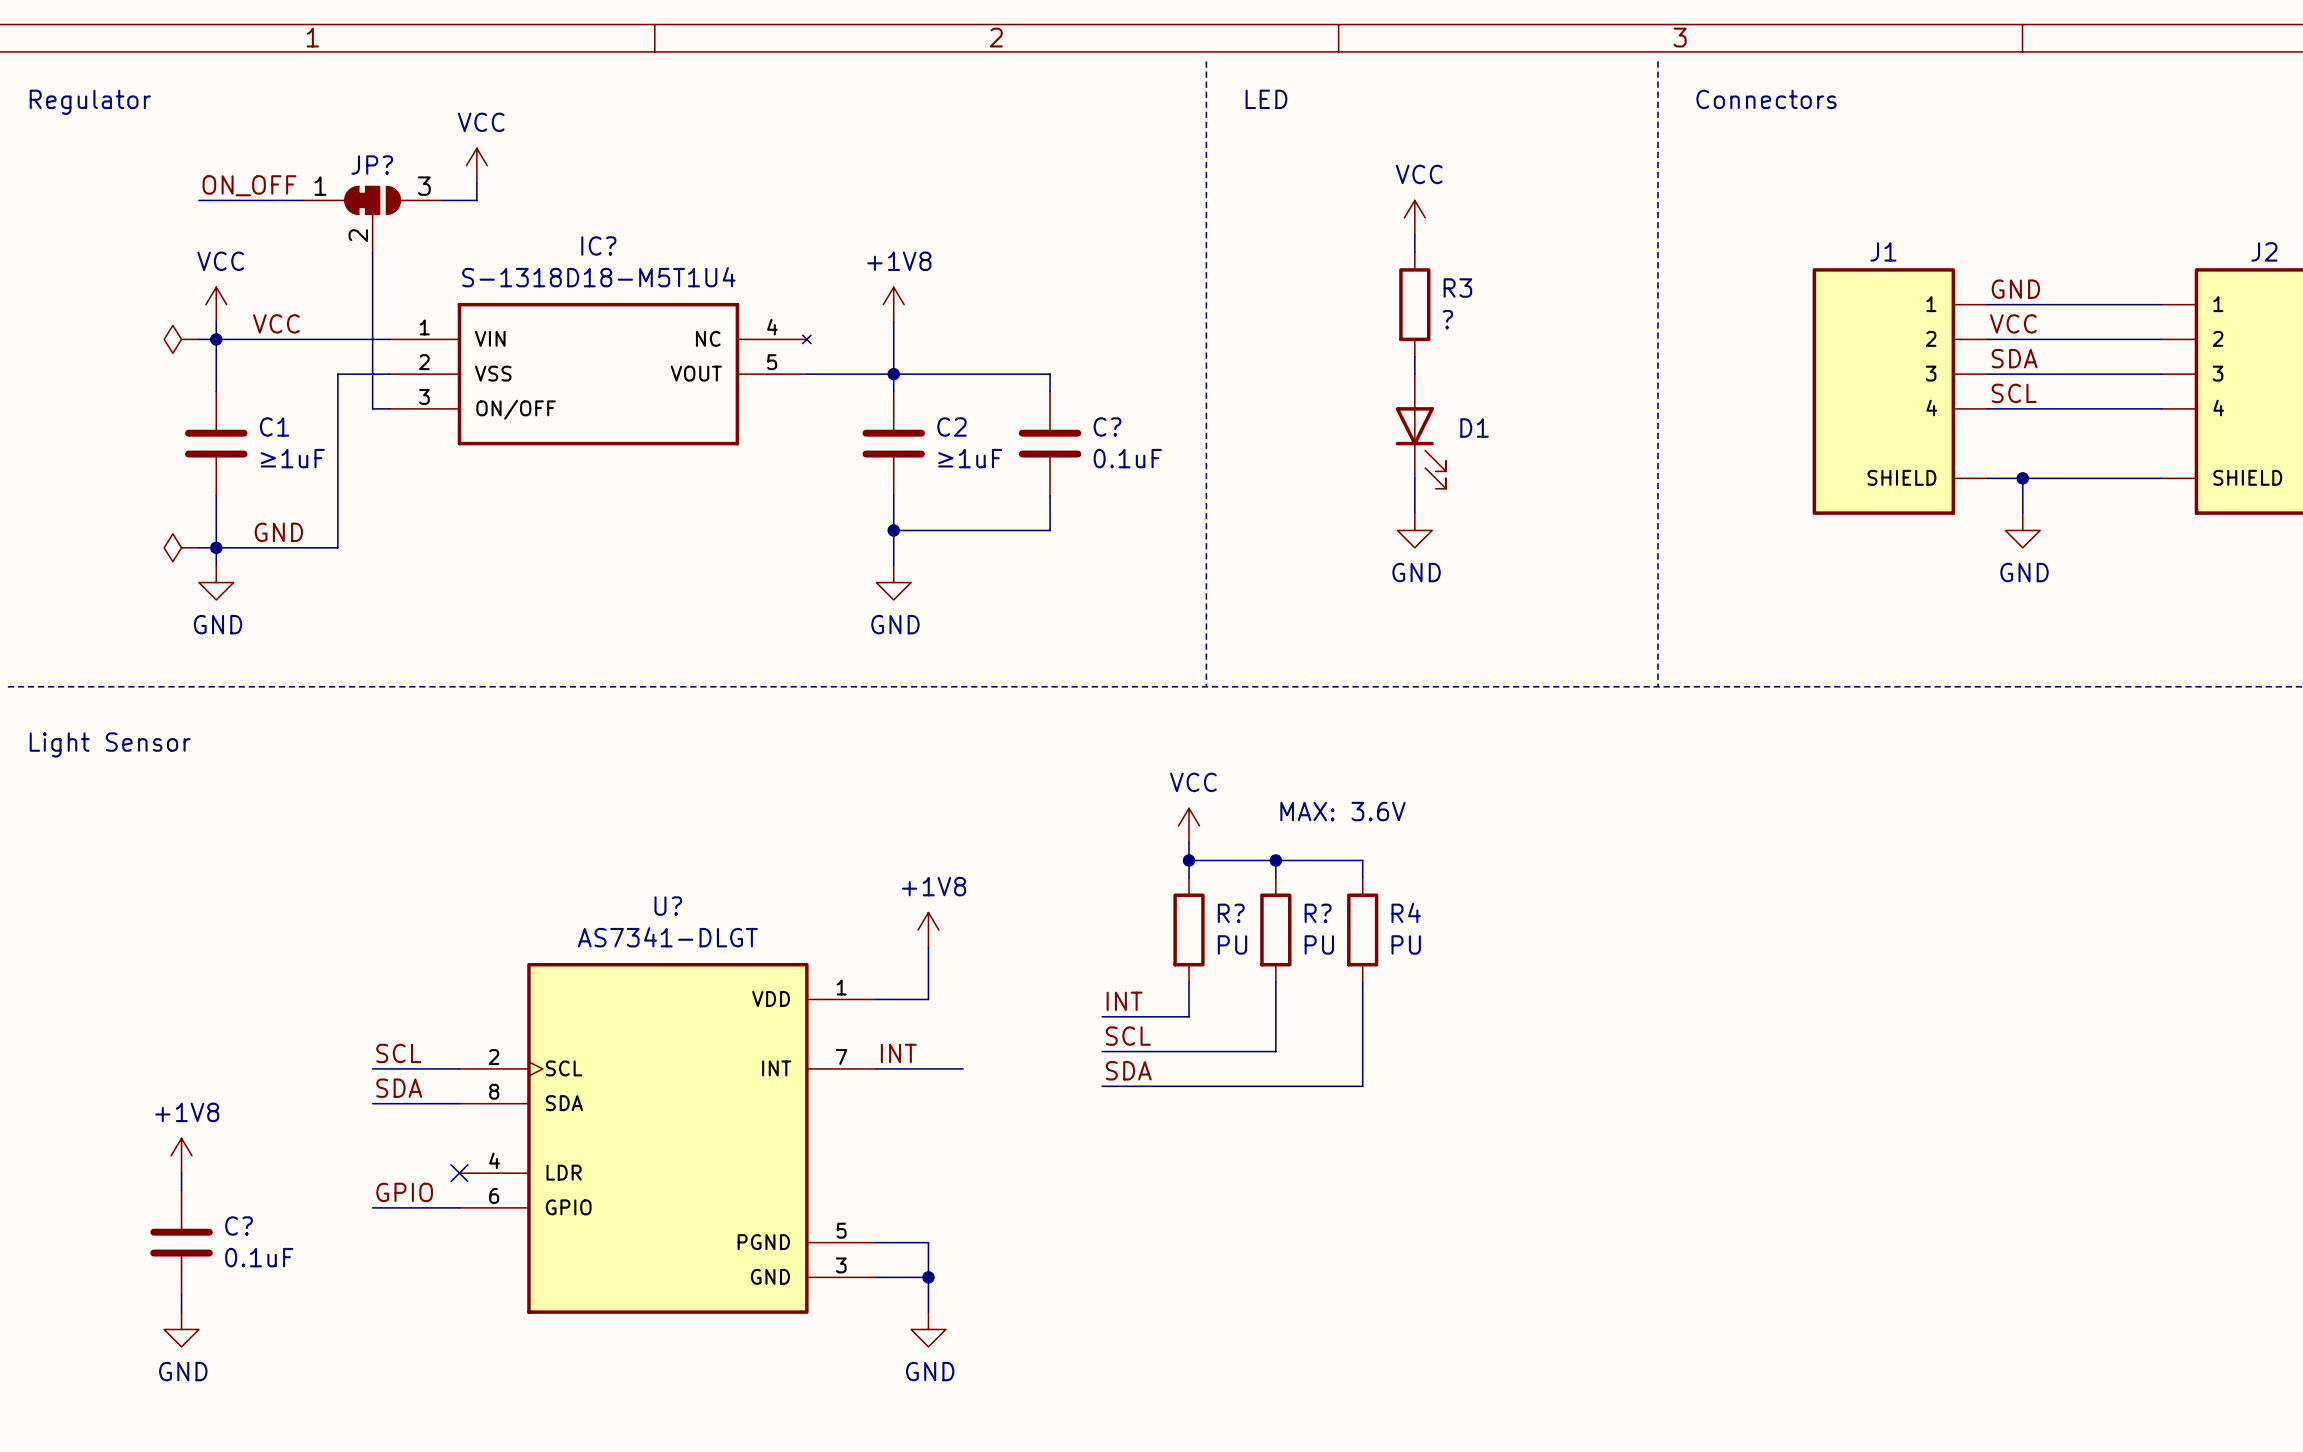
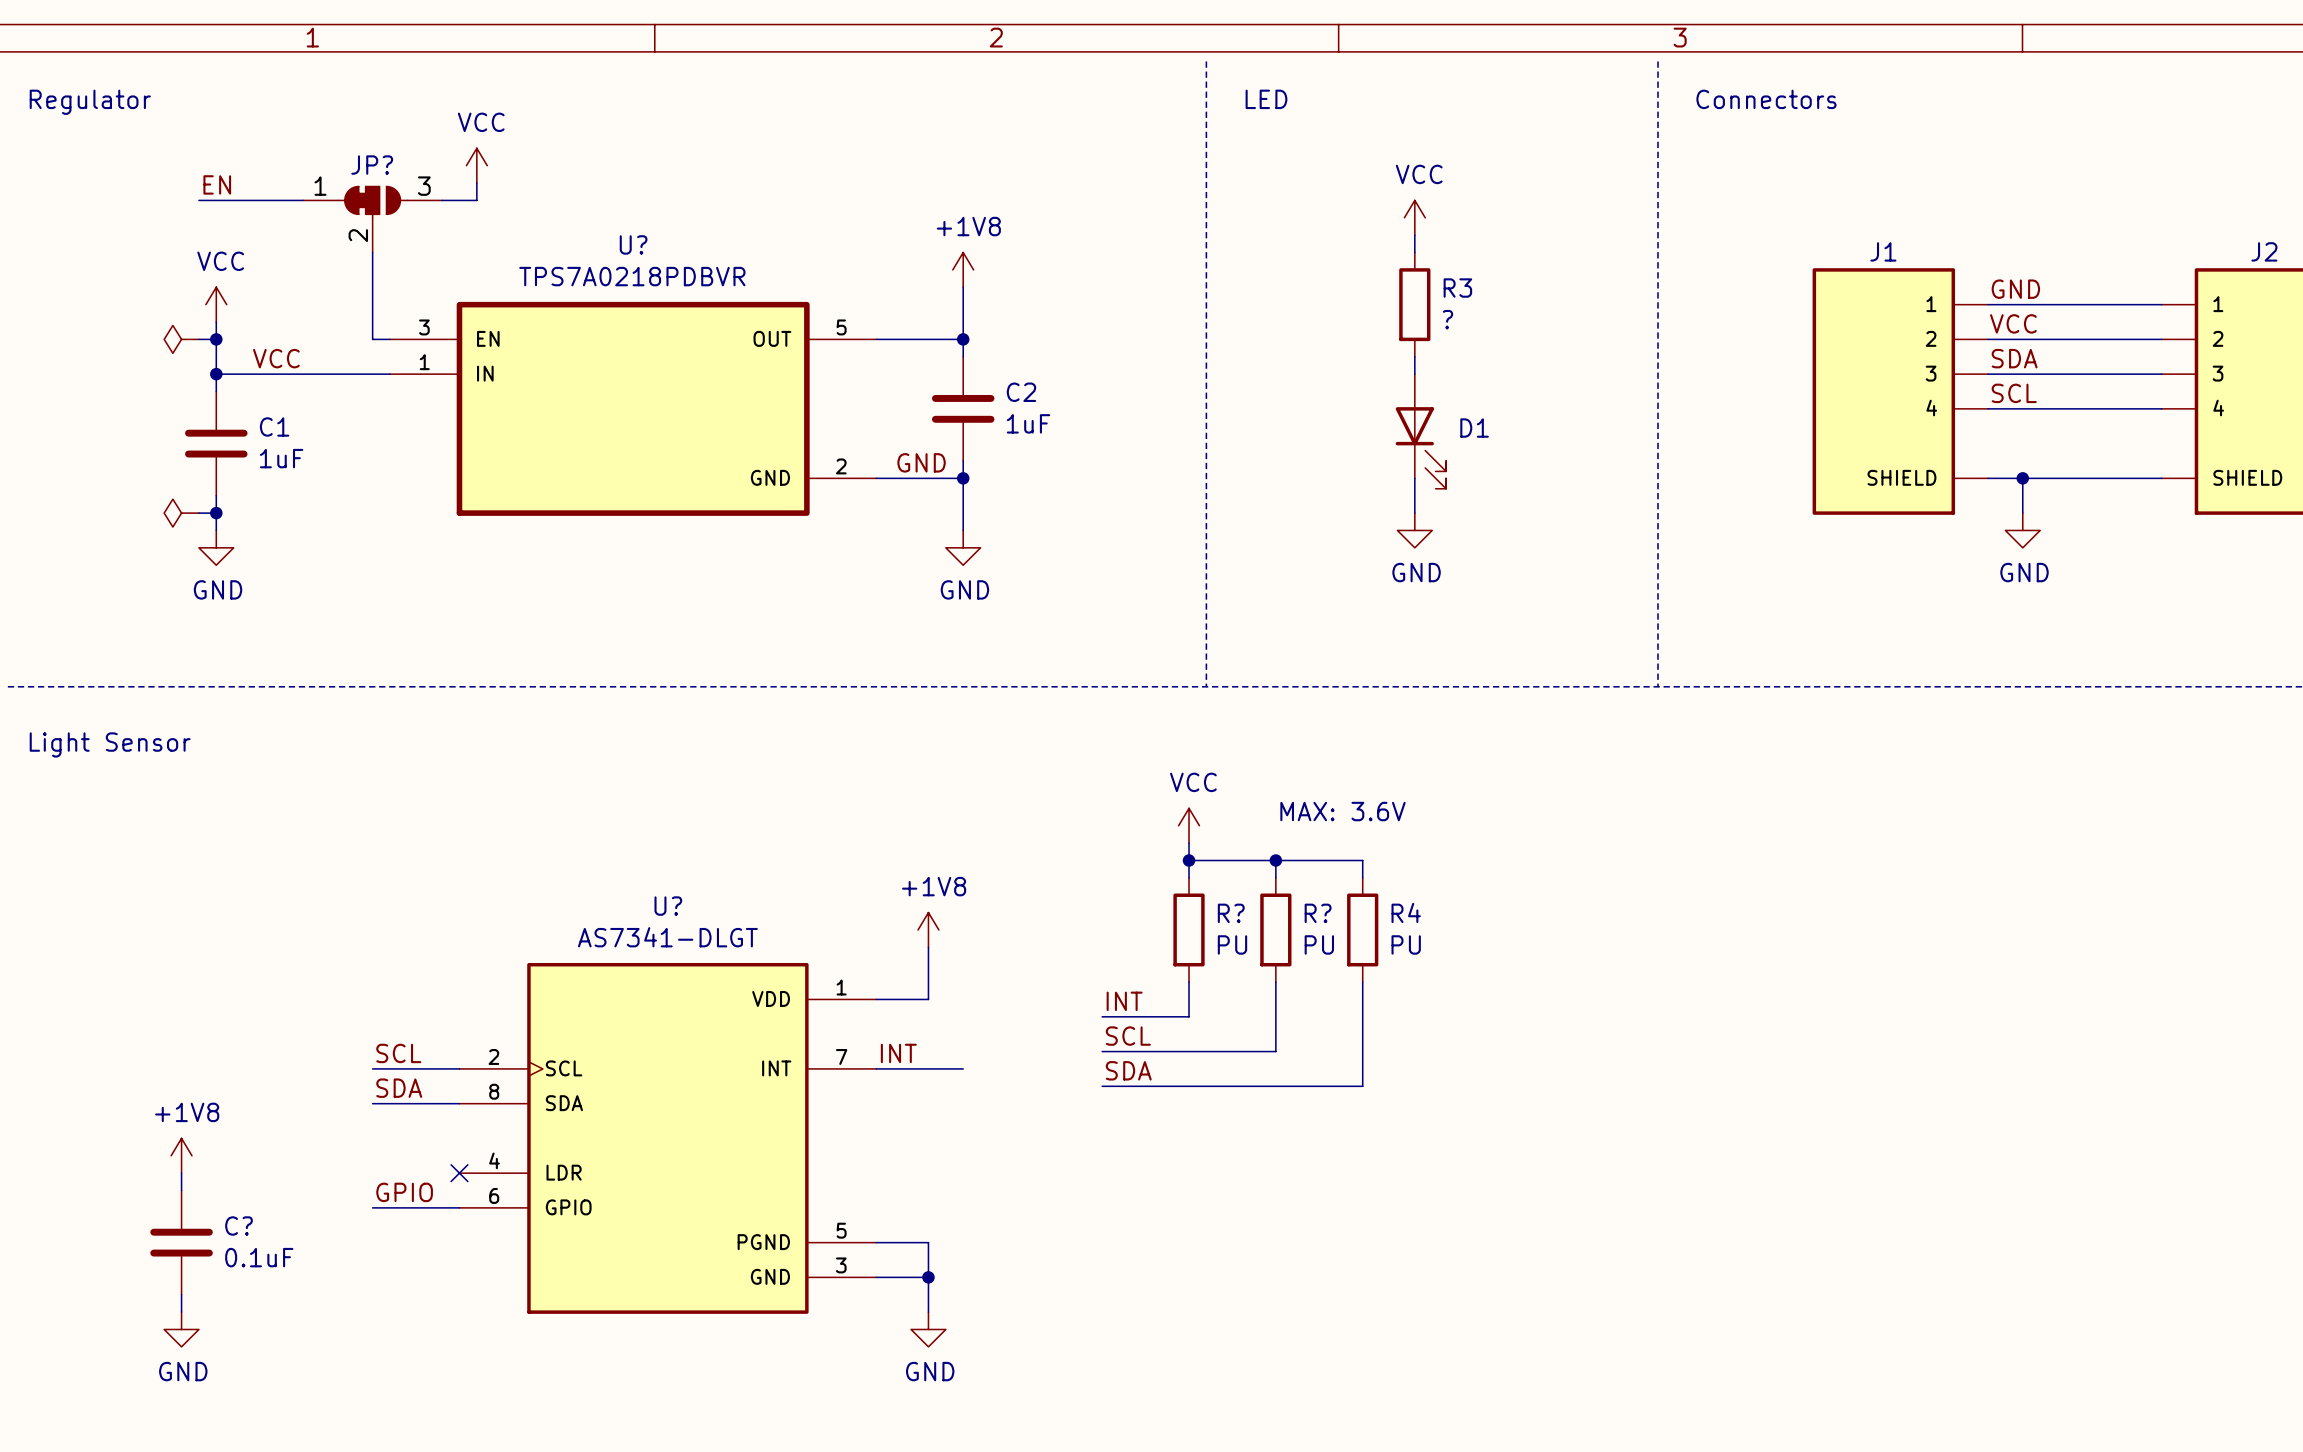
label: ON_OFF (249, 185) -> EN (217, 184)
power symbol position: +1V8 (893, 304) -> +1V8 (963, 269)
wire: (893, 322) (893, 391) -> (963, 287) (963, 356)
label position: VCC (276, 323) -> VCC (276, 358)
wire: (216, 339) (372, 339) (372, 408) (389, 408) -> none
wire: none -> (876, 339) (963, 339)
junction: none -> (963, 339)
junction: none -> (216, 374)
wire: (337, 374) (337, 547) (198, 547) -> (337, 374) (216, 374)
IC?: S-1318D18-M5T1U4 (600, 374) -> none
wire: (806, 374) (1050, 374) (1050, 391) -> none
junction: (893, 374) -> none
U?: none -> TPS7A0218PDBVR (633, 408)
C2 position: (893, 443) -> (963, 408)
C?: 0.1uF (1050, 443) -> none
C1 value: ≥1uF (292, 458) -> 1uF (281, 458)
C2 value: ≥1uF (970, 458) -> 1uF (1028, 423)
label: none -> GND (921, 462)
wire: none -> (876, 478) (963, 478)
junction: none -> (963, 478)
wire: (893, 495) (893, 565) -> (963, 460) (963, 530)
wire: (1050, 495) (1050, 530) (893, 530) -> none
wire: none -> (198, 513) (216, 513)
junction: (893, 530) -> none
label: GND (278, 532) -> none
power symbol position: (181, 547) -> (181, 513)
junction position: (216, 547) -> (216, 513)
power symbol position: GND (216, 582) -> GND (216, 547)
power symbol position: GND (893, 582) -> GND (963, 547)

